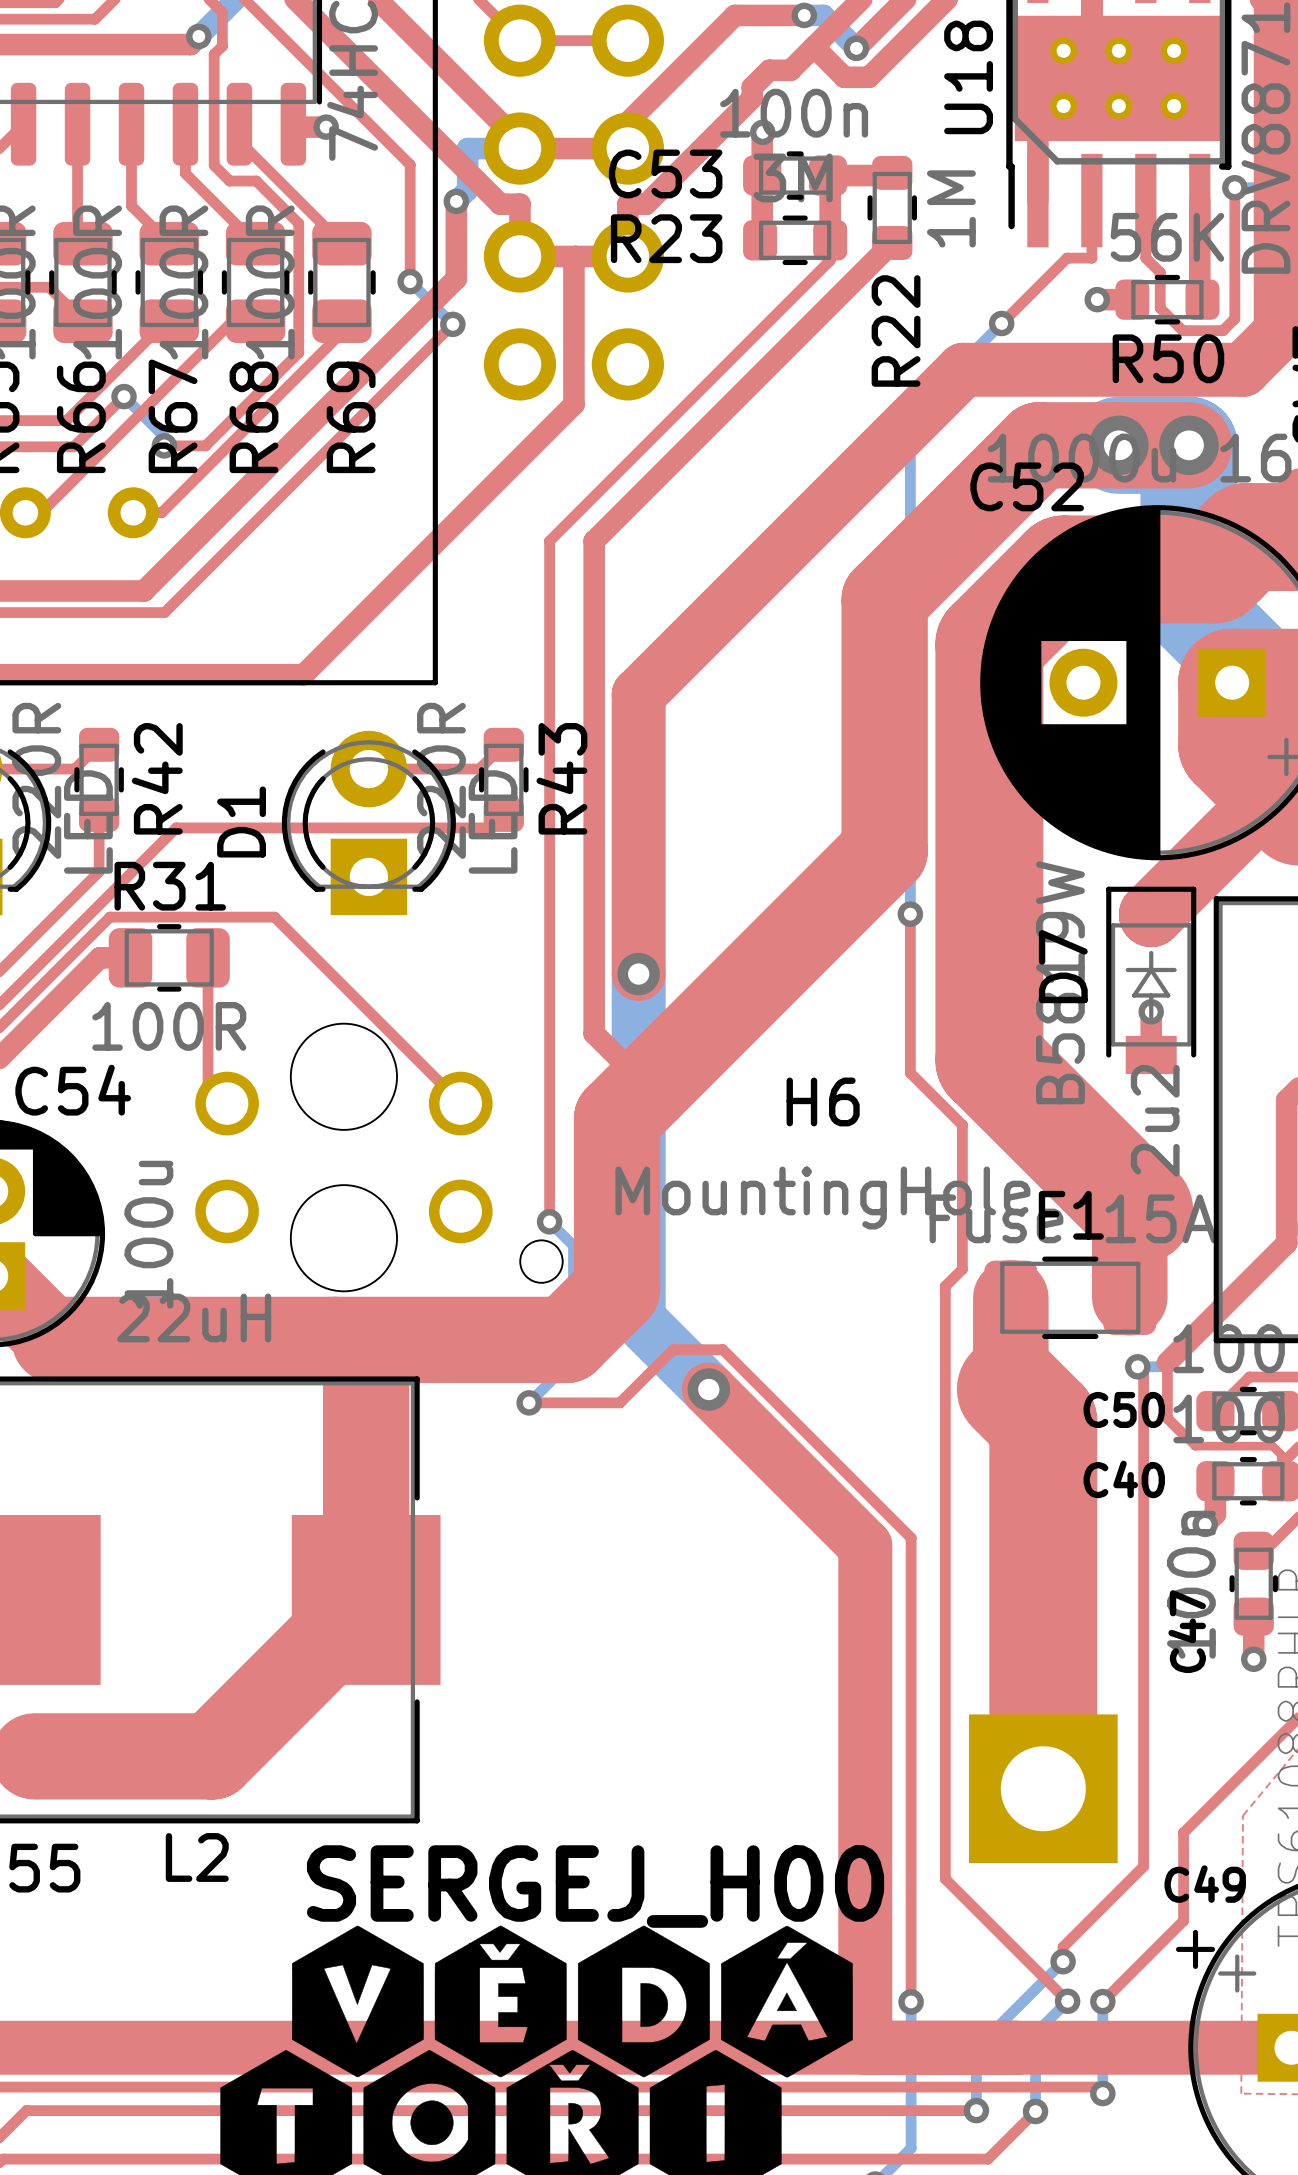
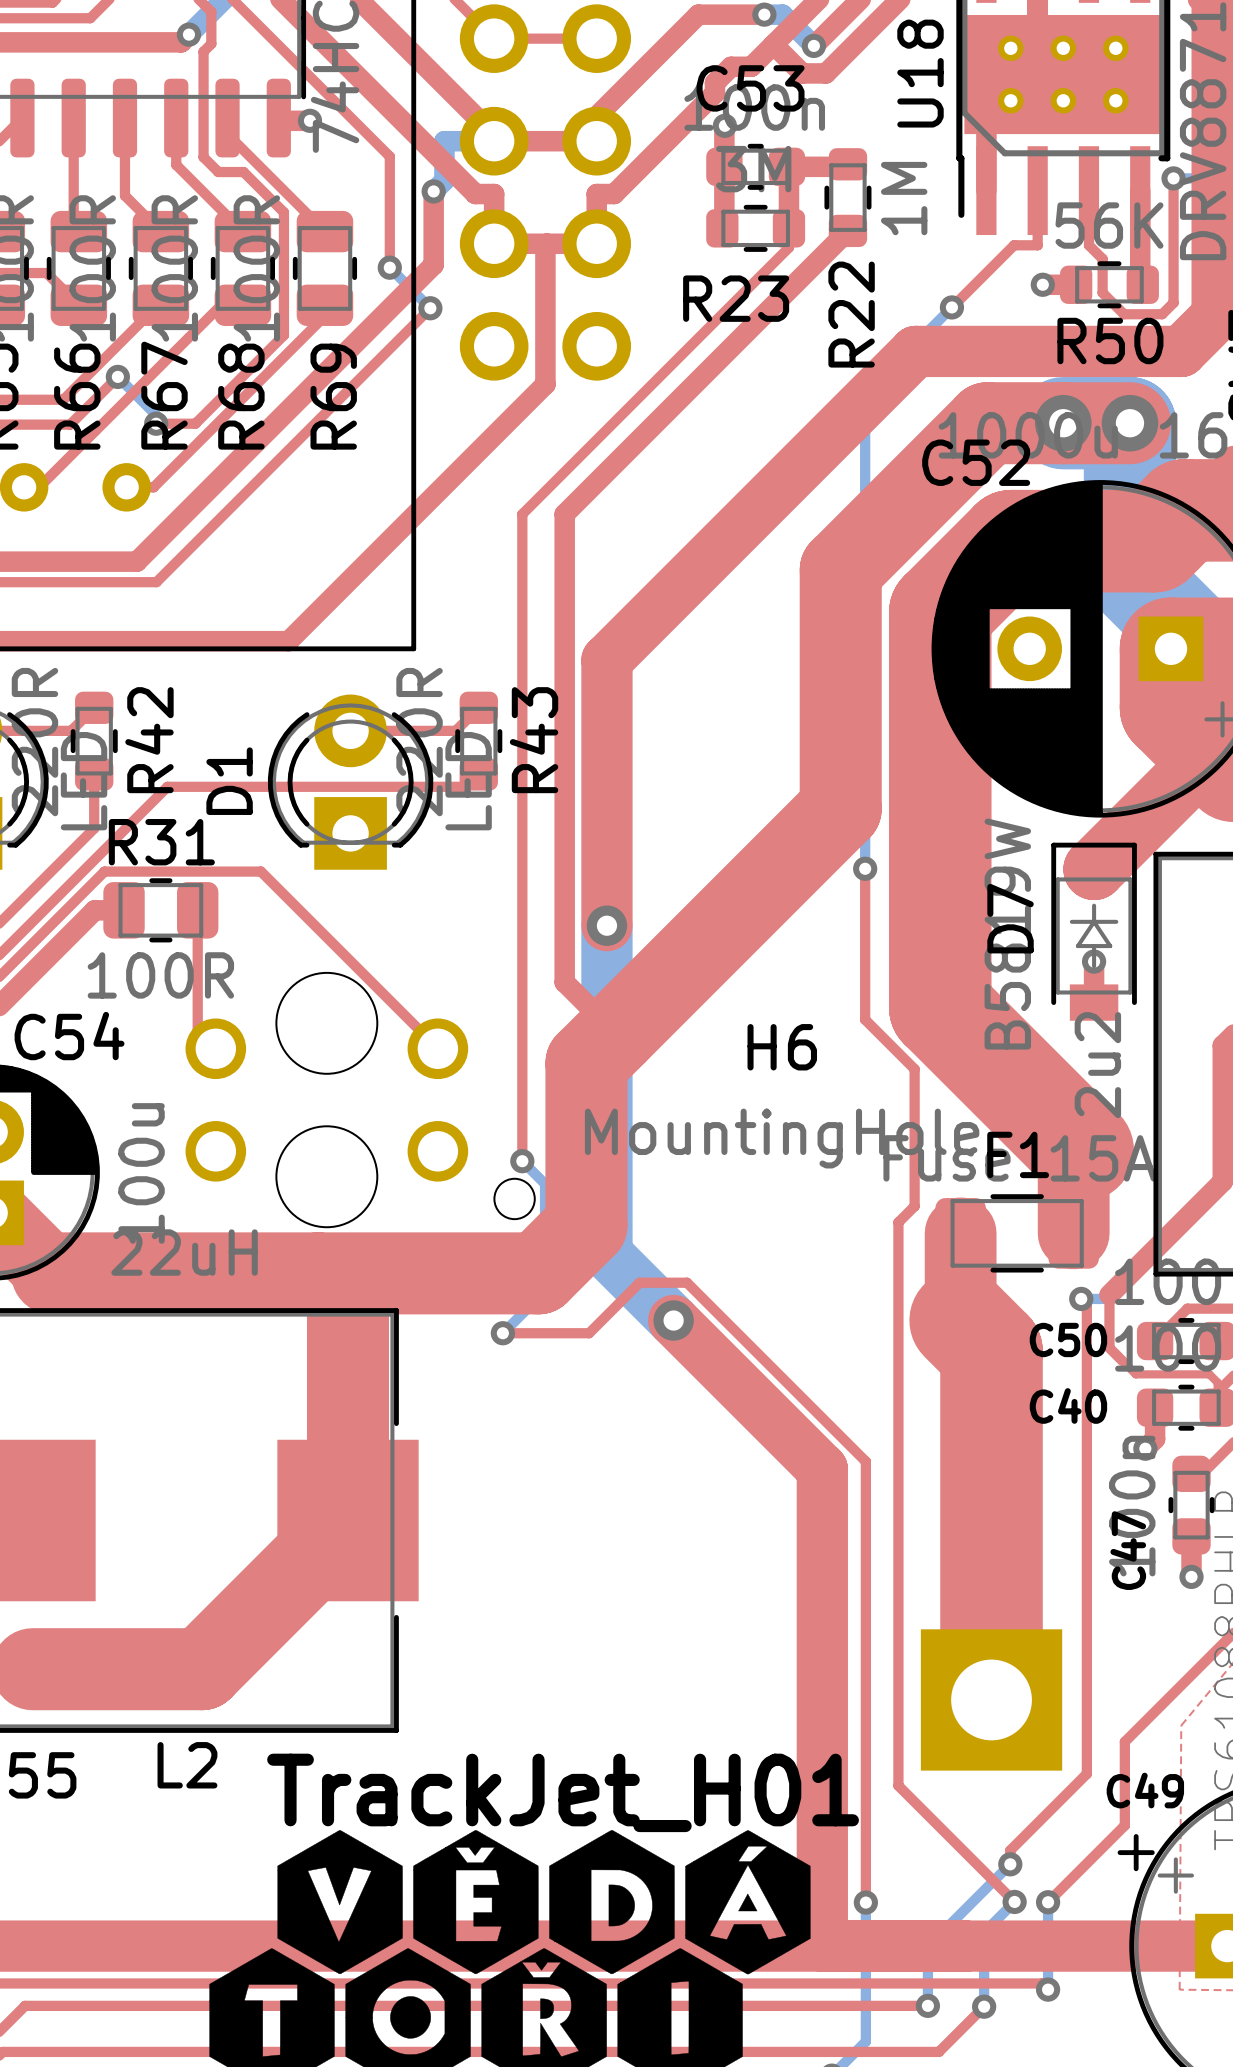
C53 name position: C53 (665, 173) -> C53 (750, 88)
R23 name position: R23 (666, 238) -> R23 (736, 298)
text: SERGEJ_H00 (595, 1886) -> TrackJet_H01 (563, 1792)

